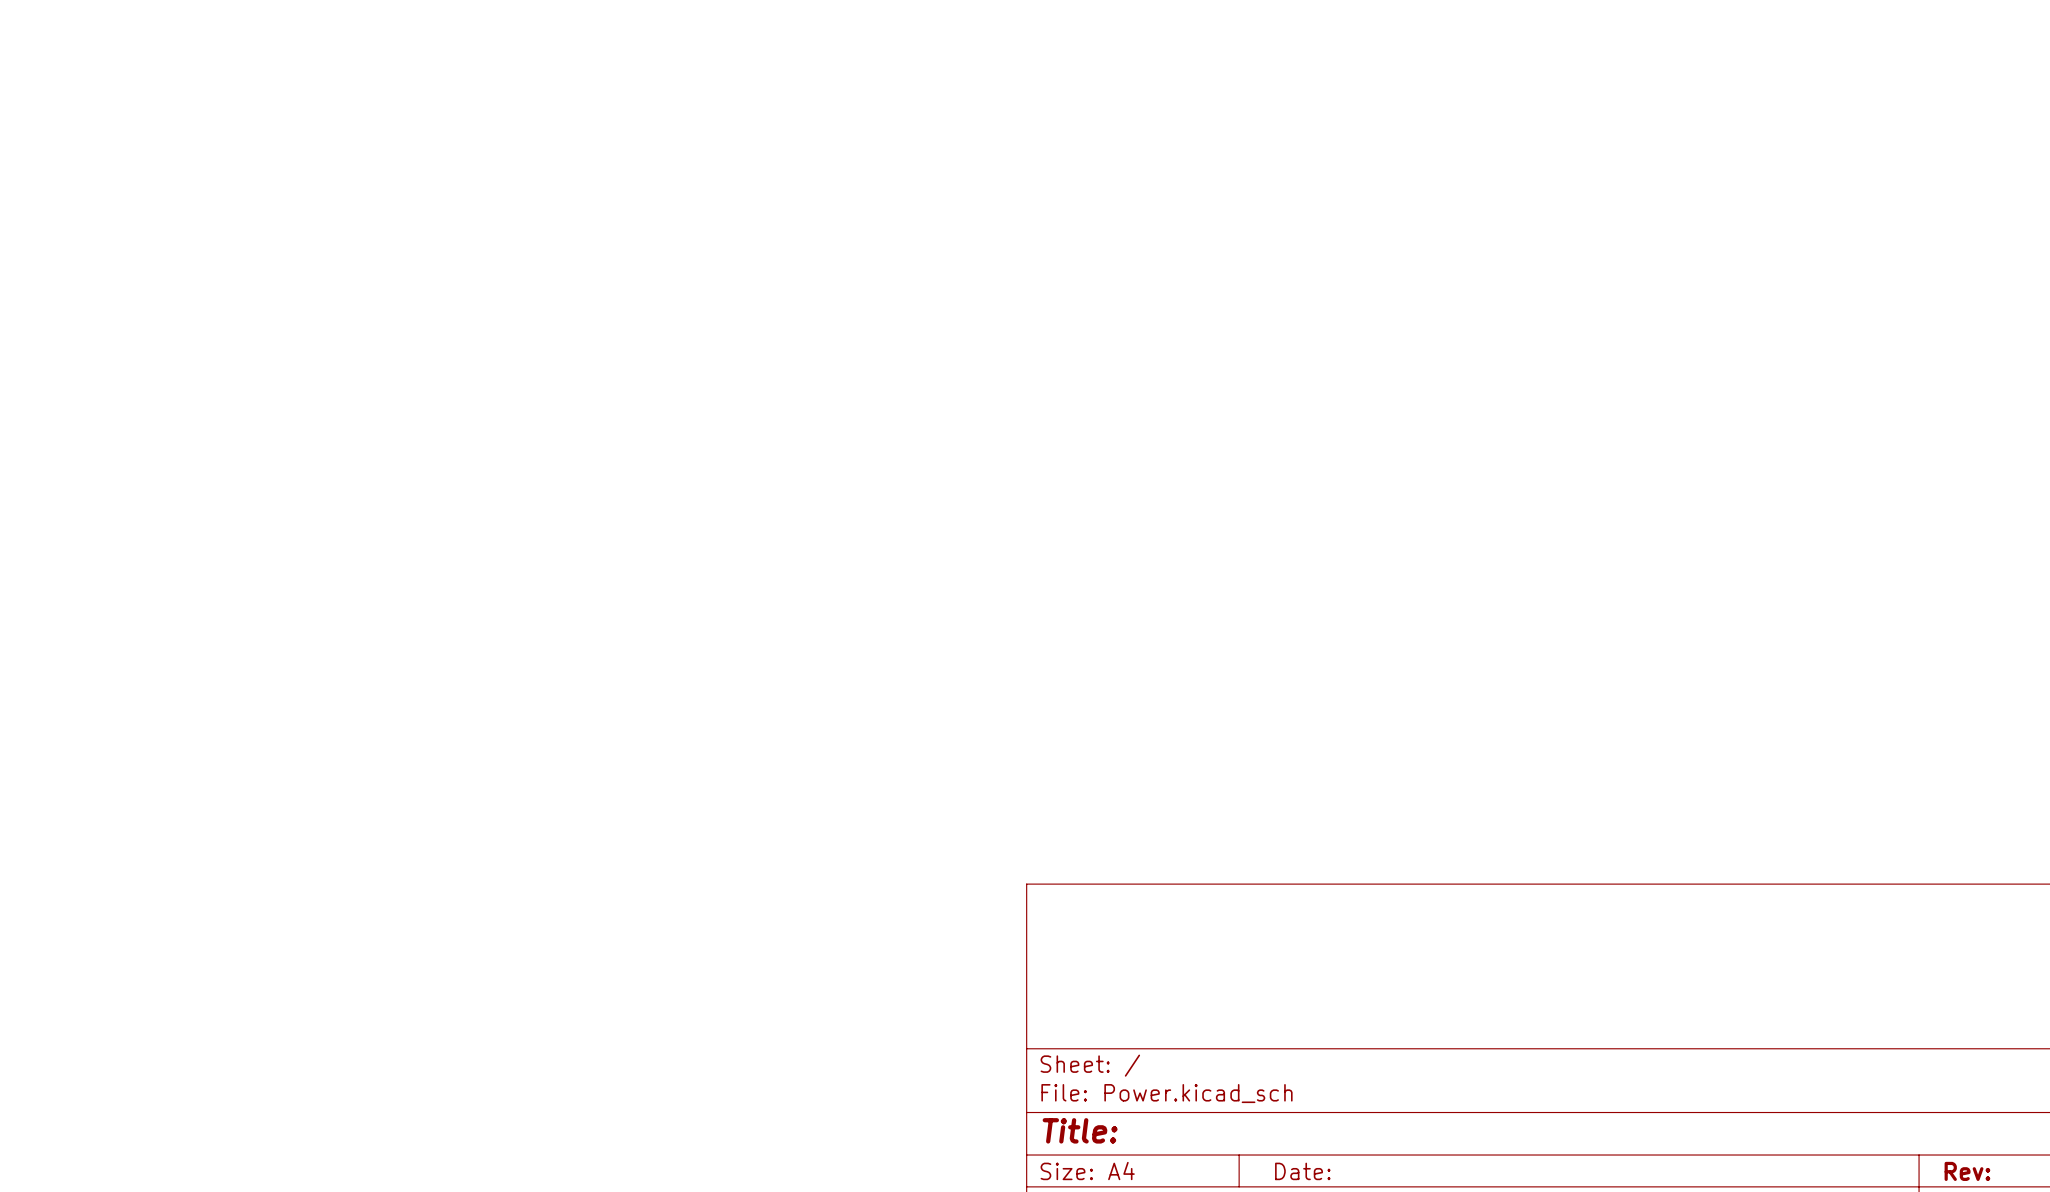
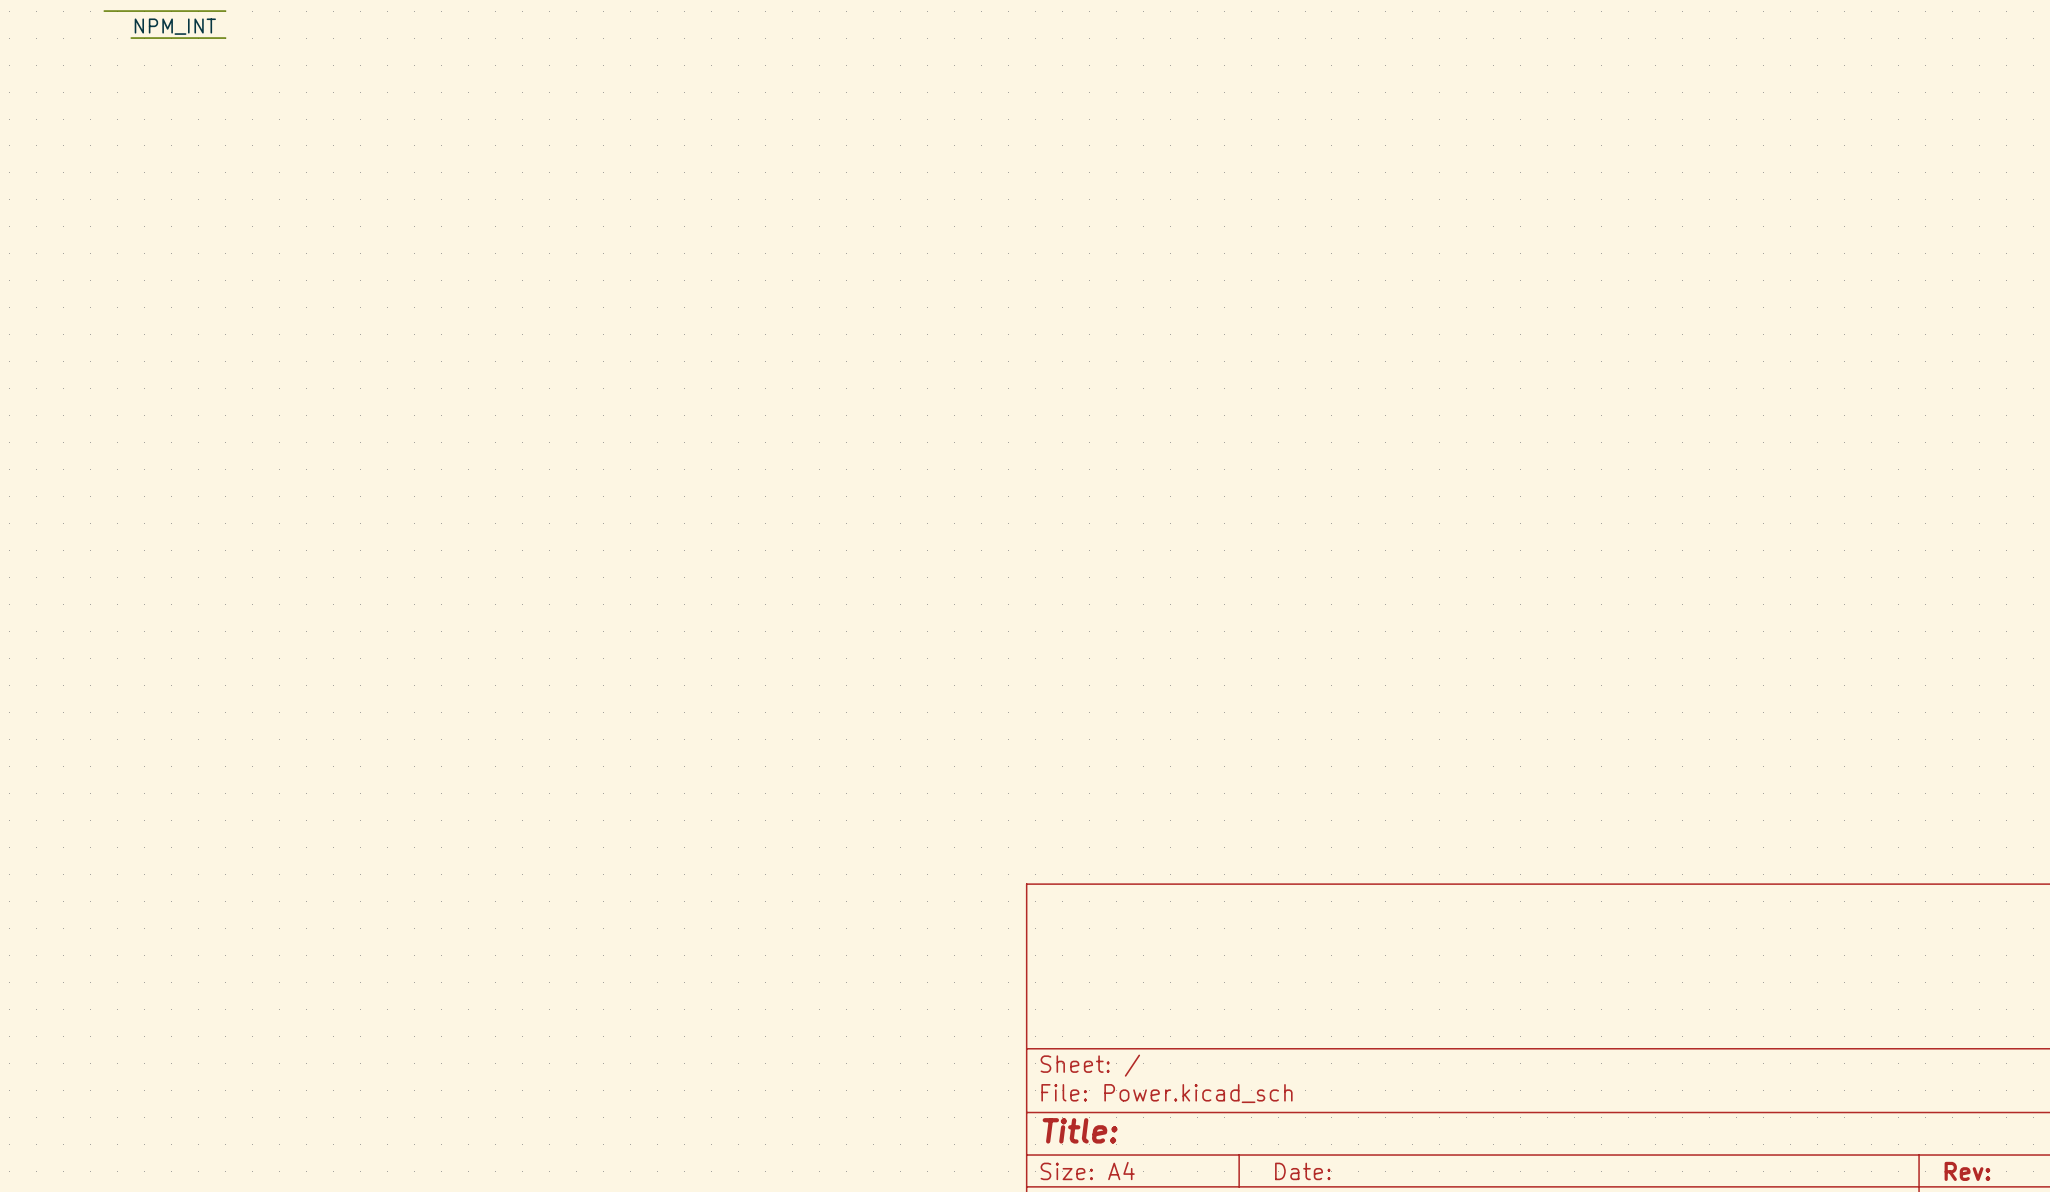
wire: none -> (104, 11) (225, 11)
label: none -> NPM_INT (175, 26)
wire: none -> (131, 38) (225, 38)

